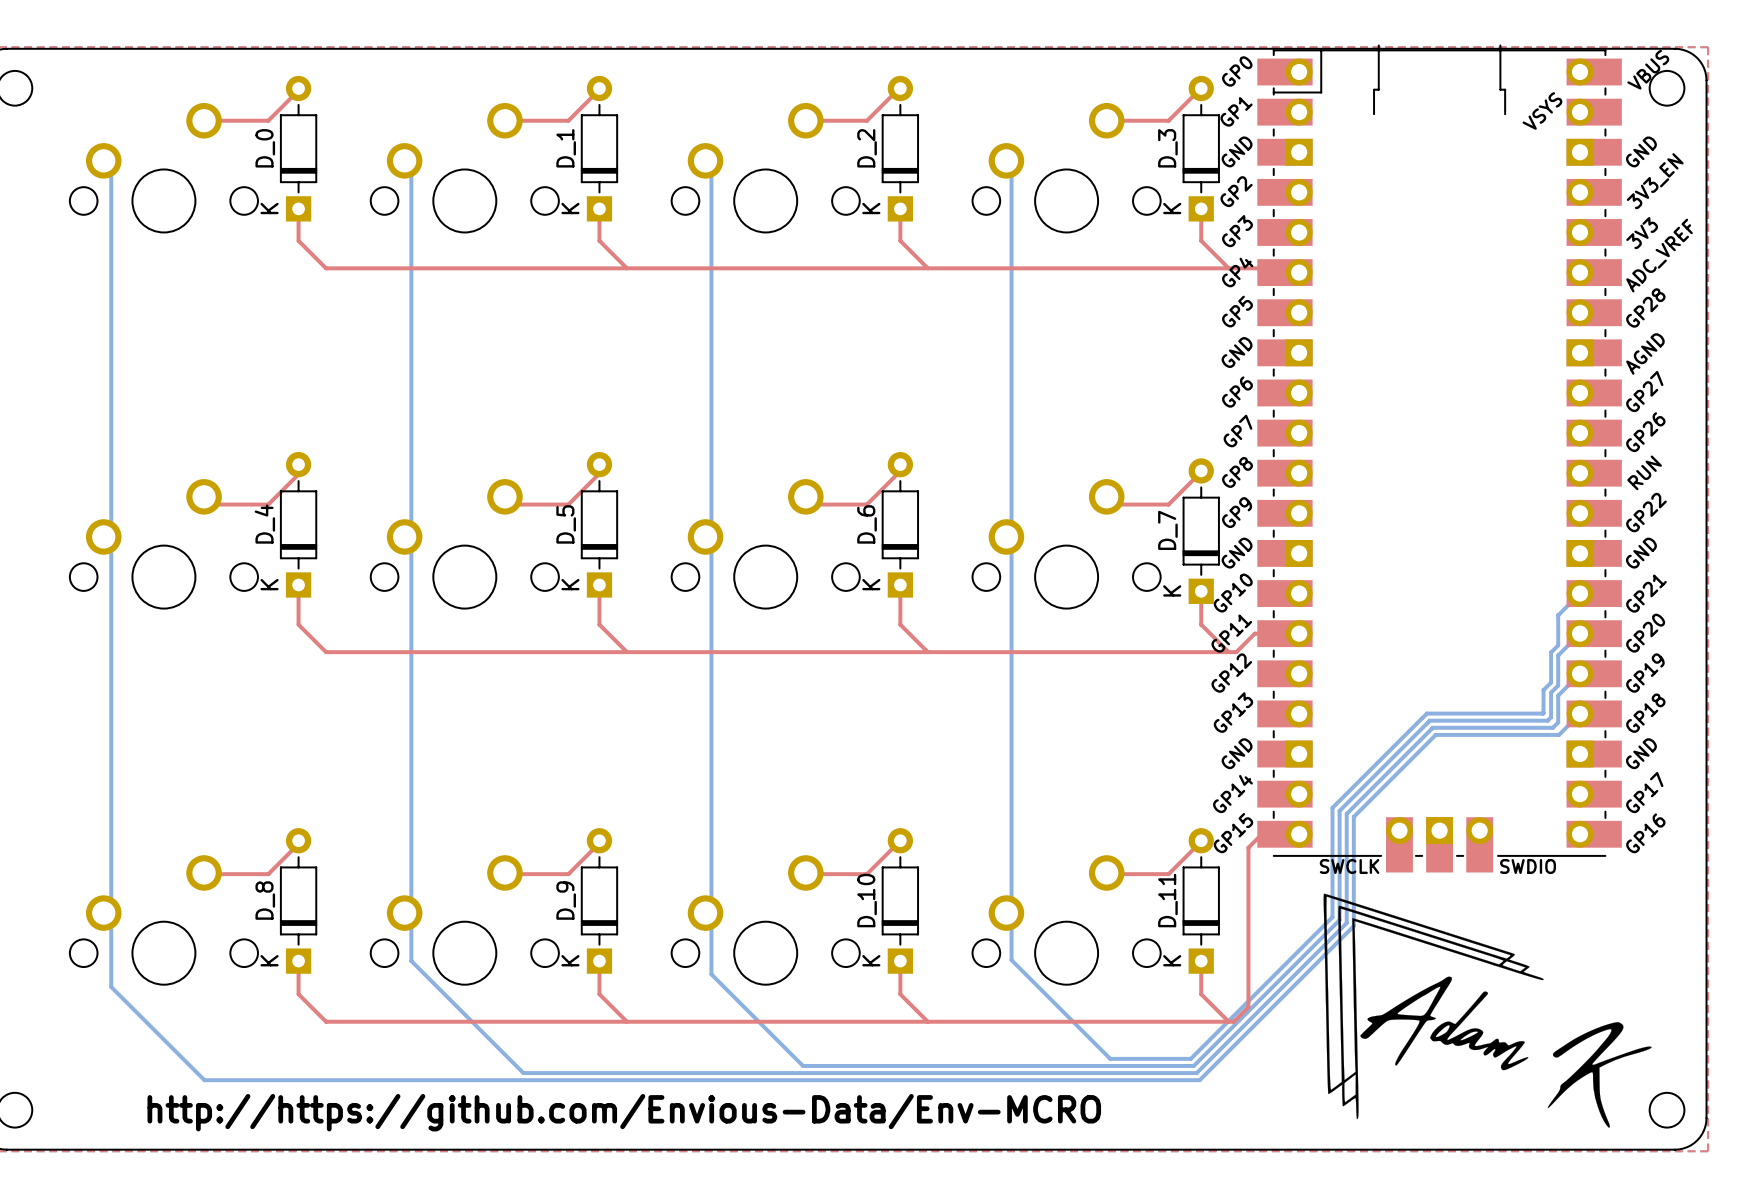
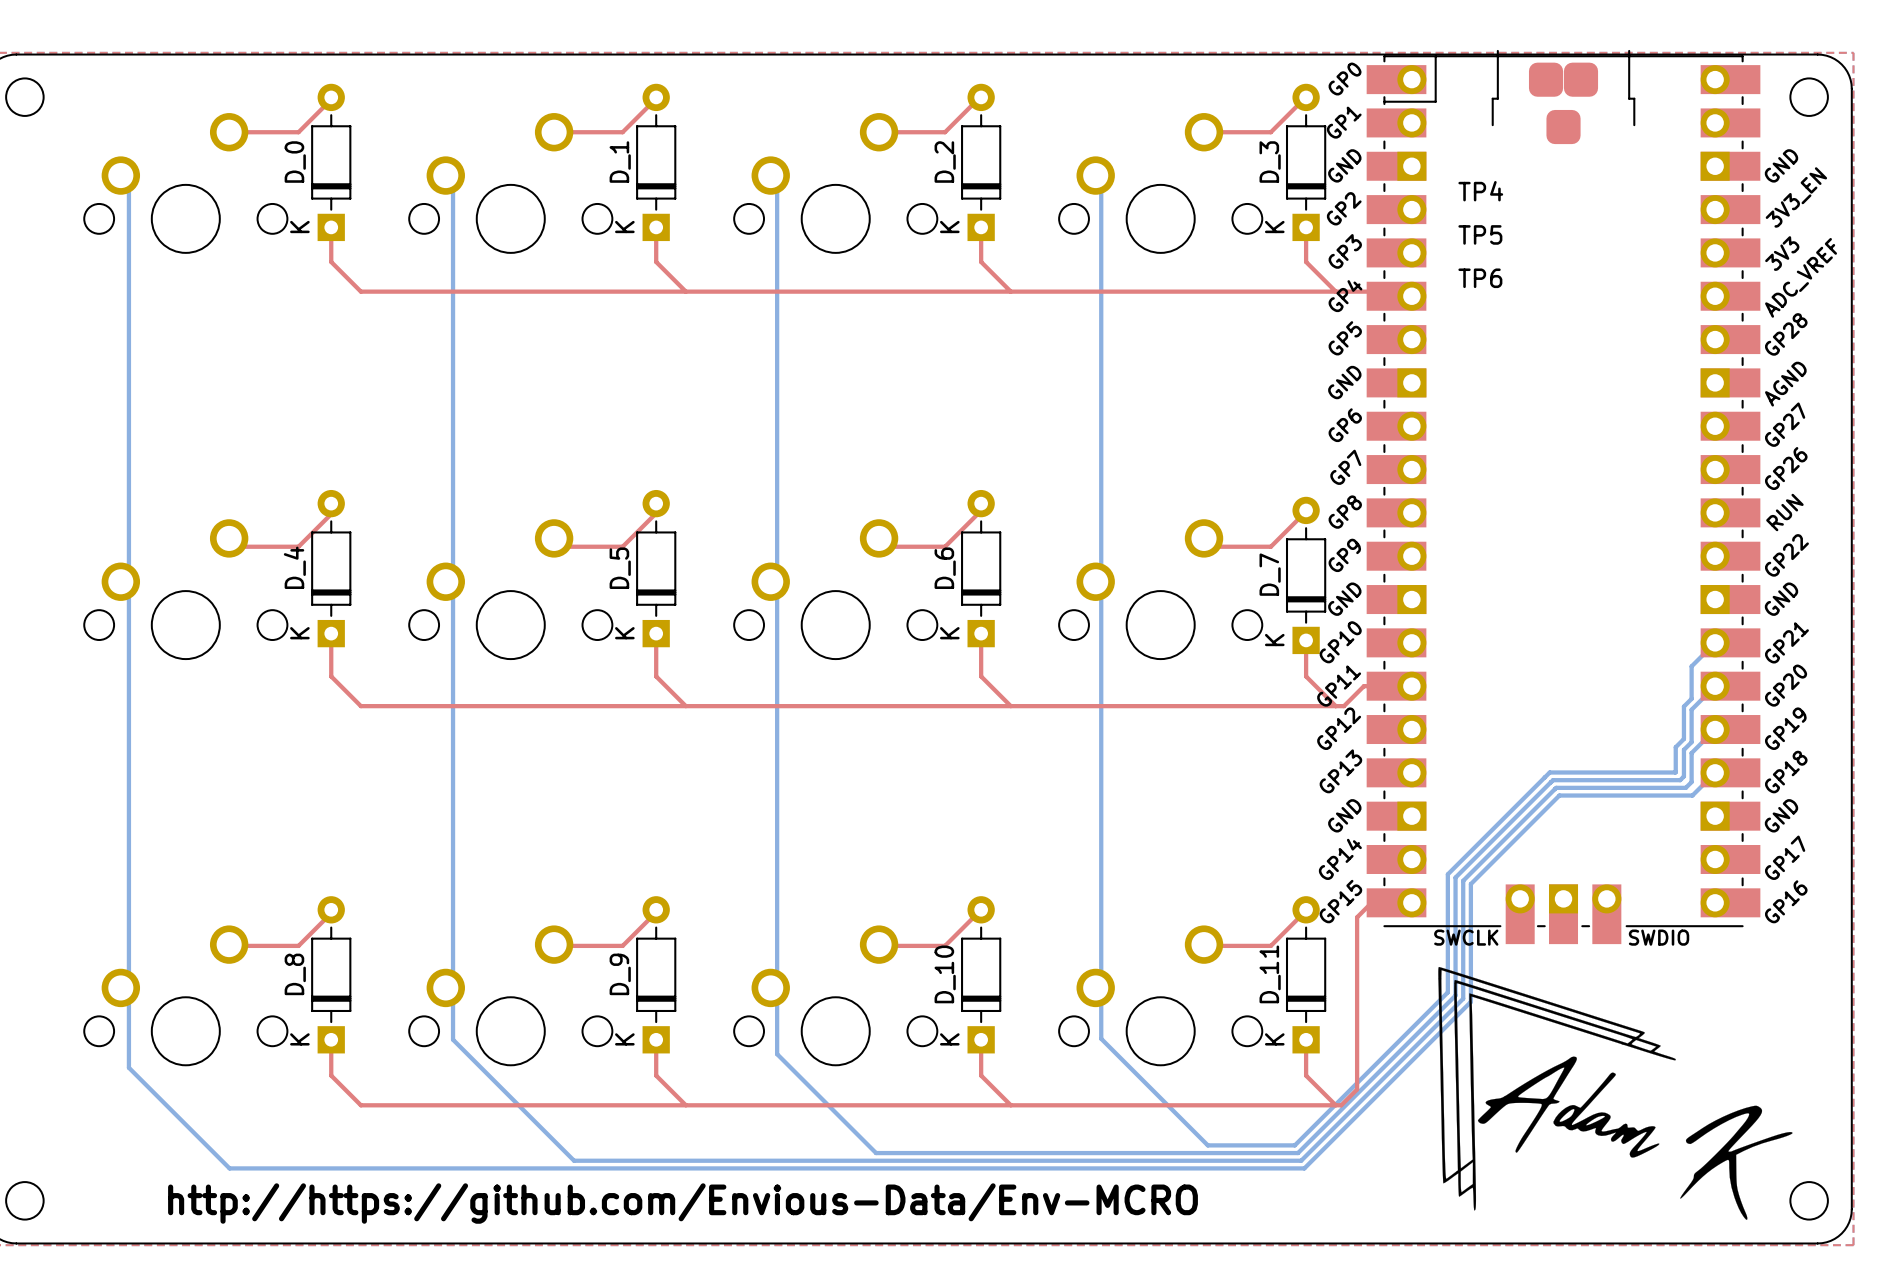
part footprint: [1257, 44, 1622, 873] -> [1366, 49, 1761, 945]

